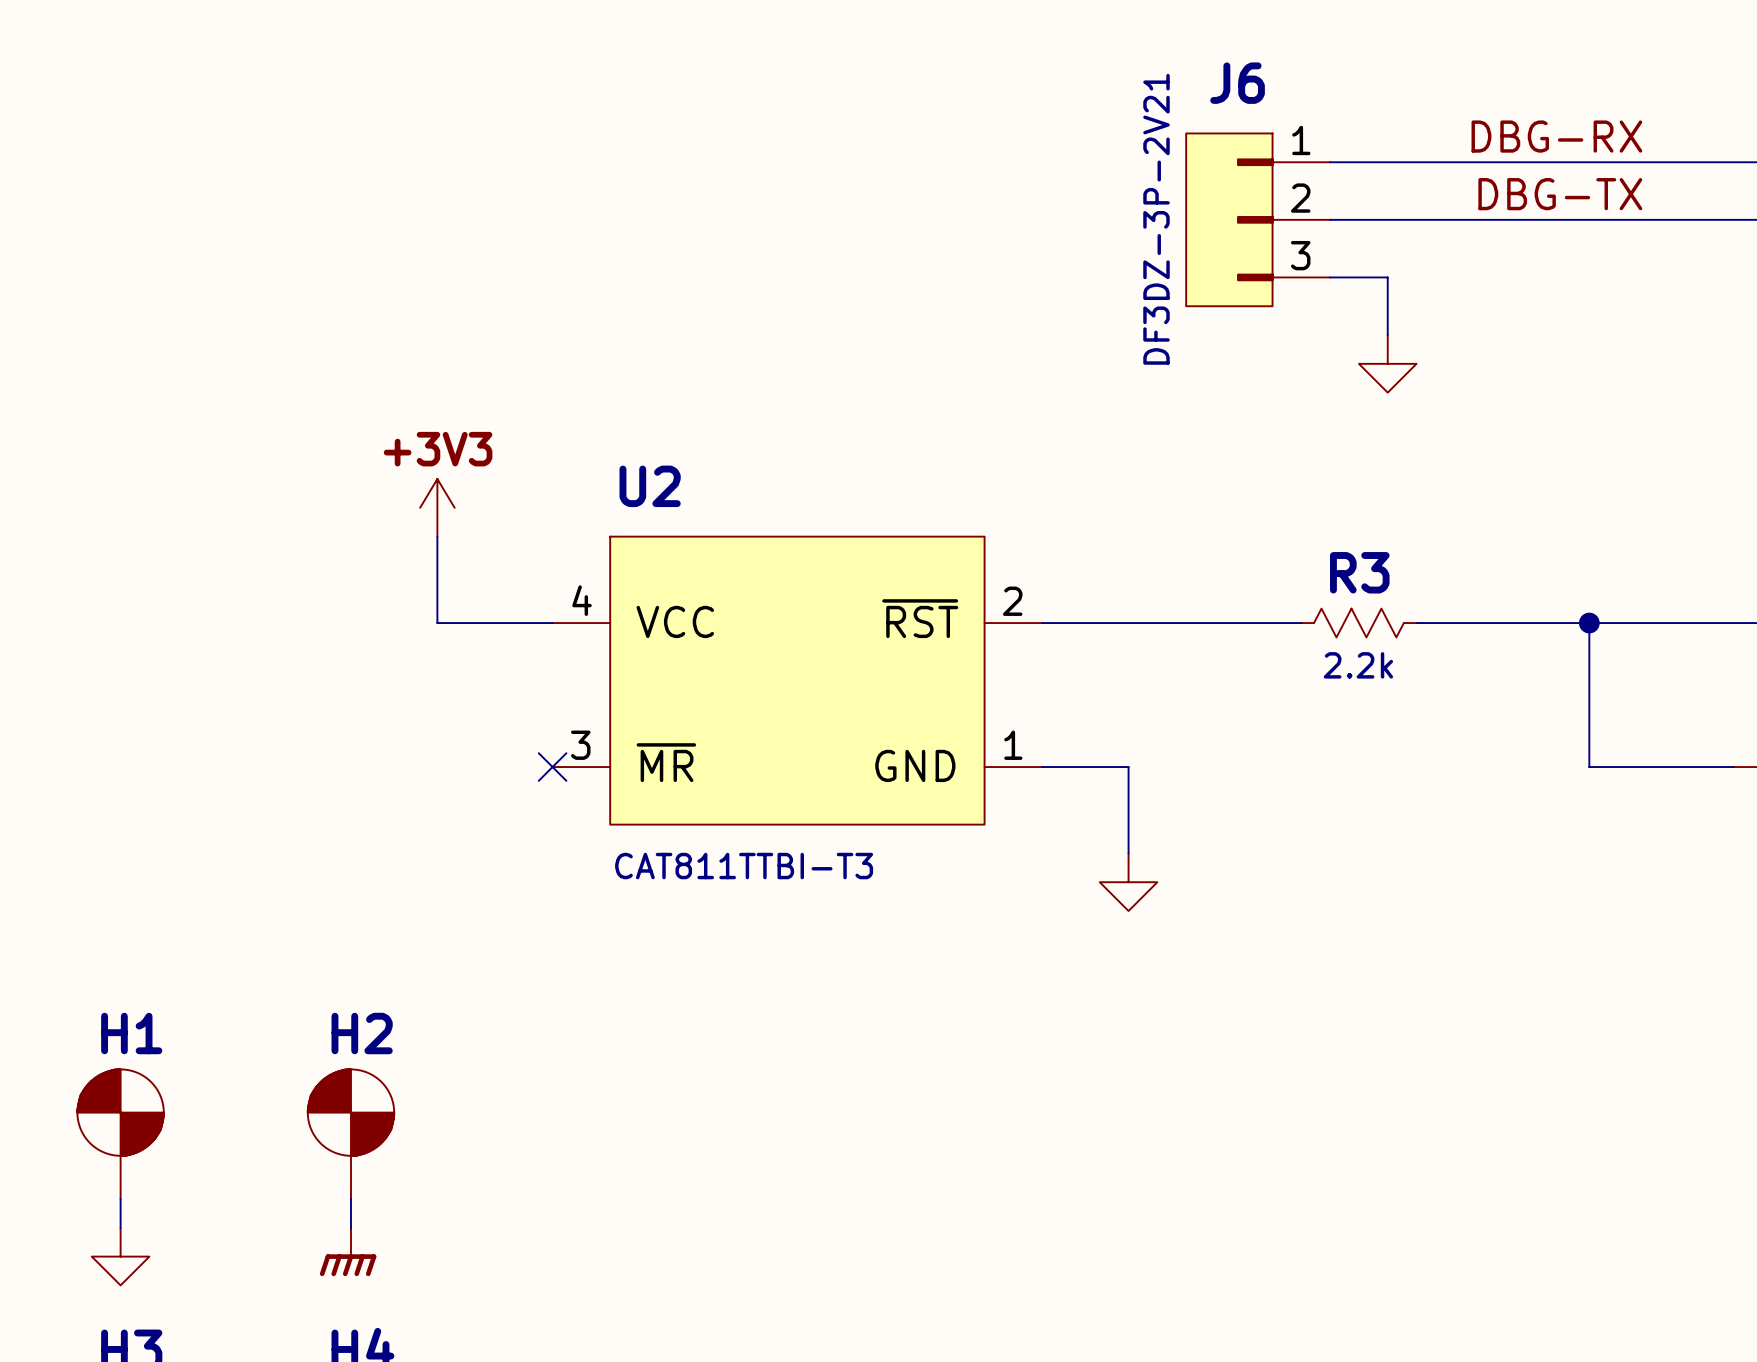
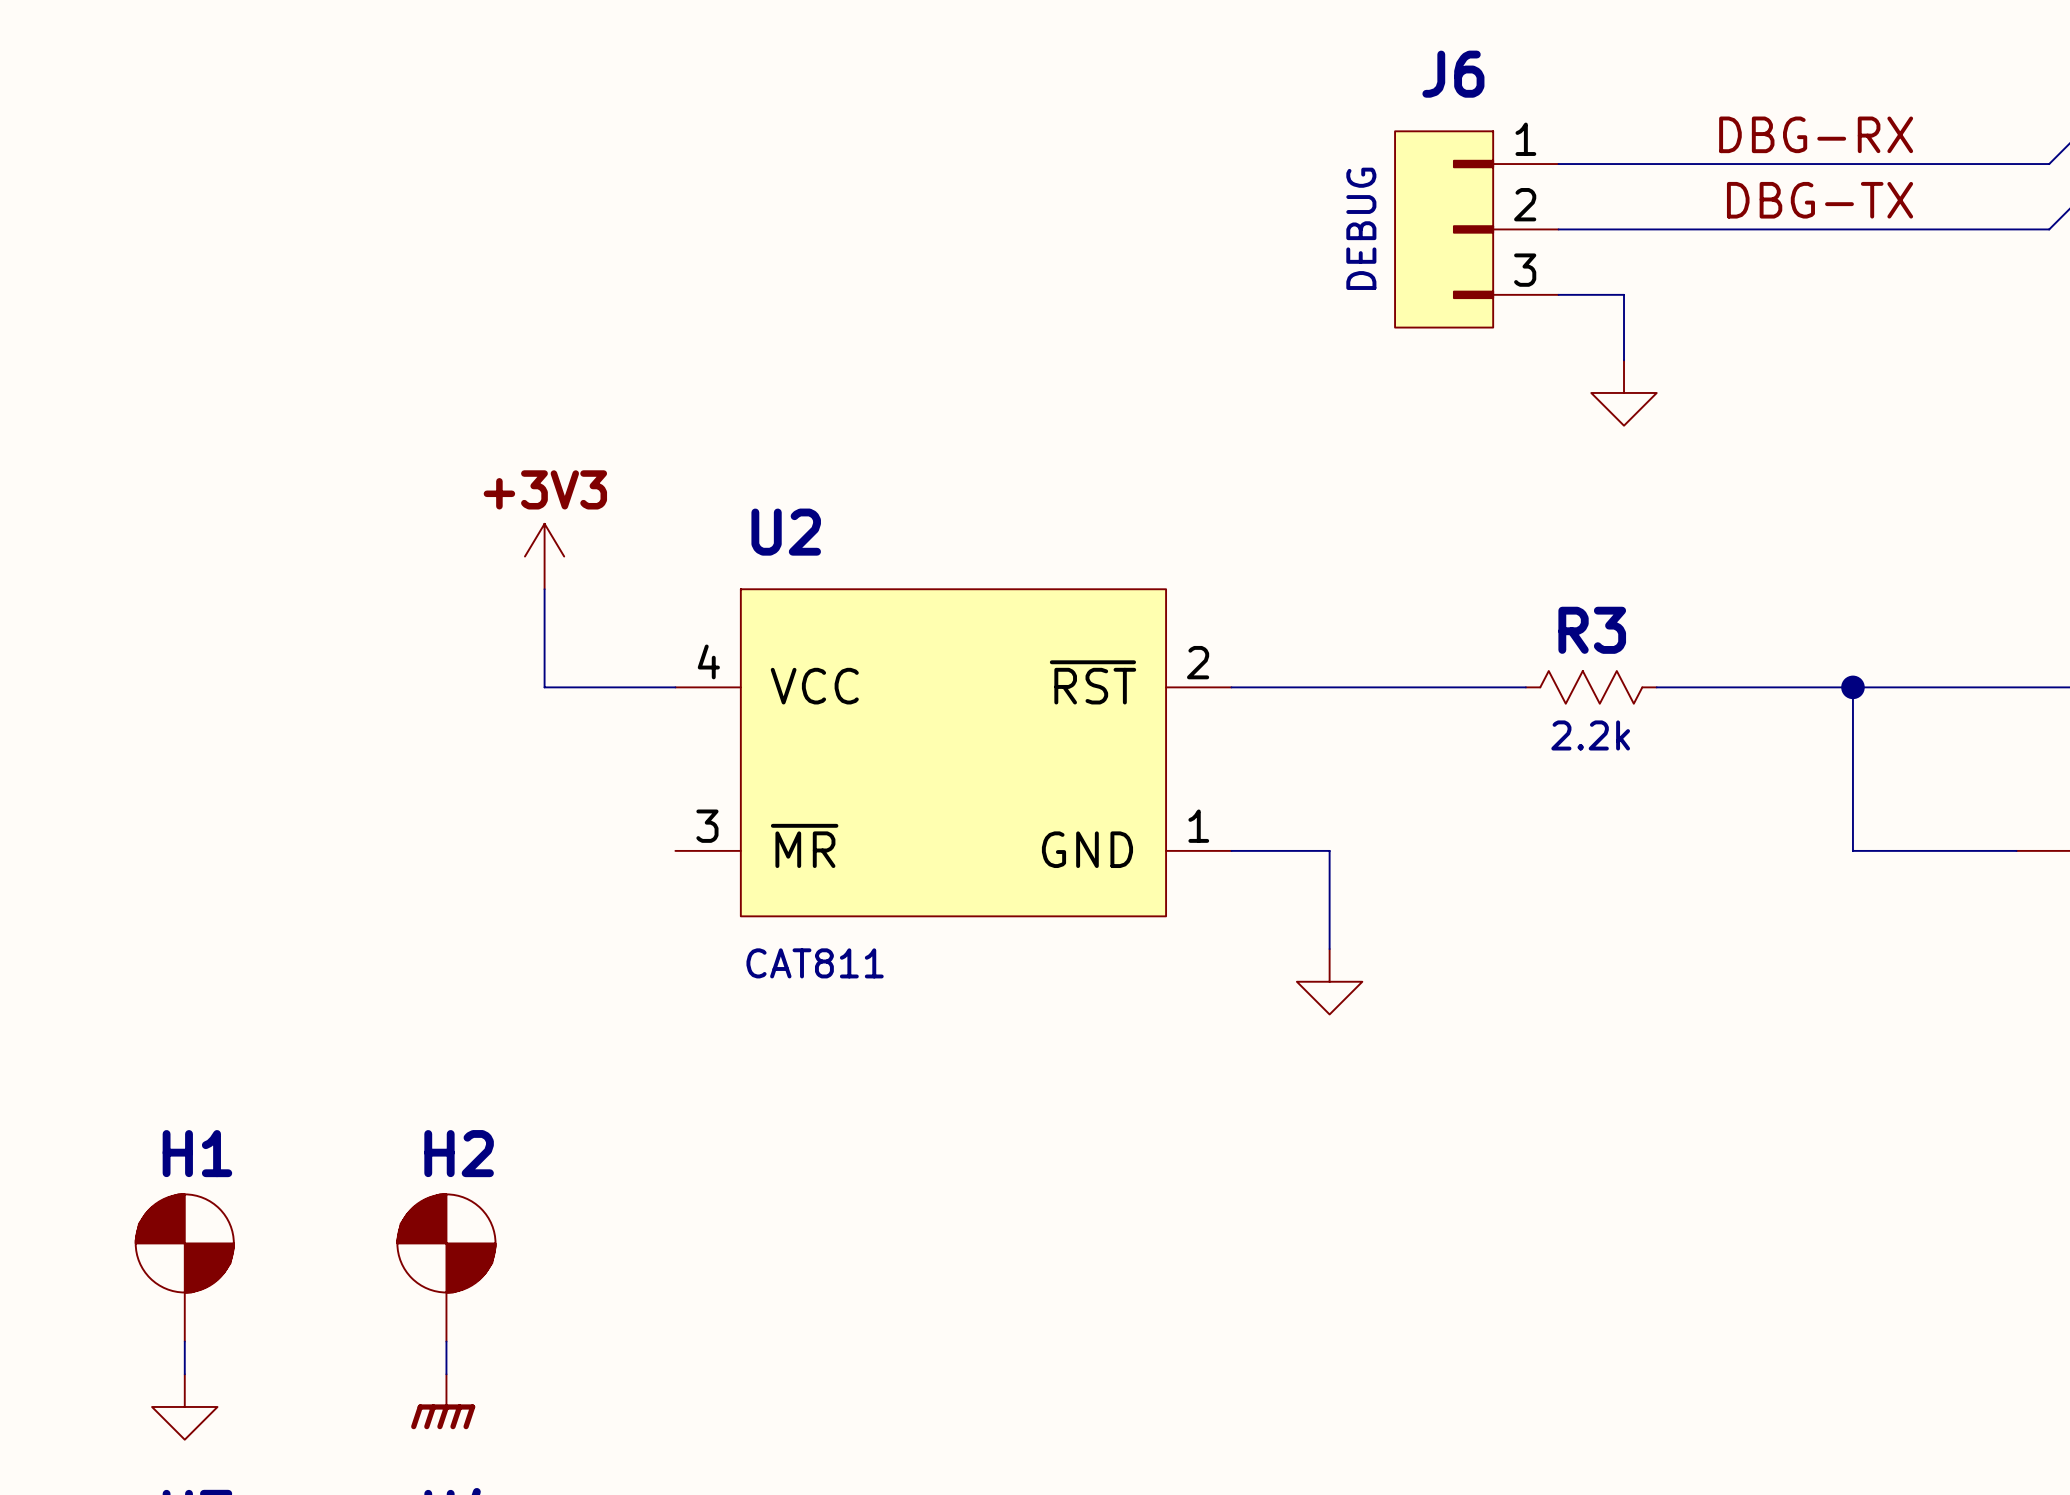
J6 value: DF3DZ-3P-2V21 (1156, 219) -> DEBUG (1361, 228)
no-connect mark: (552, 767) -> none
U2 value: CAT811TTBI-T3 (744, 866) -> CAT811 (815, 963)

